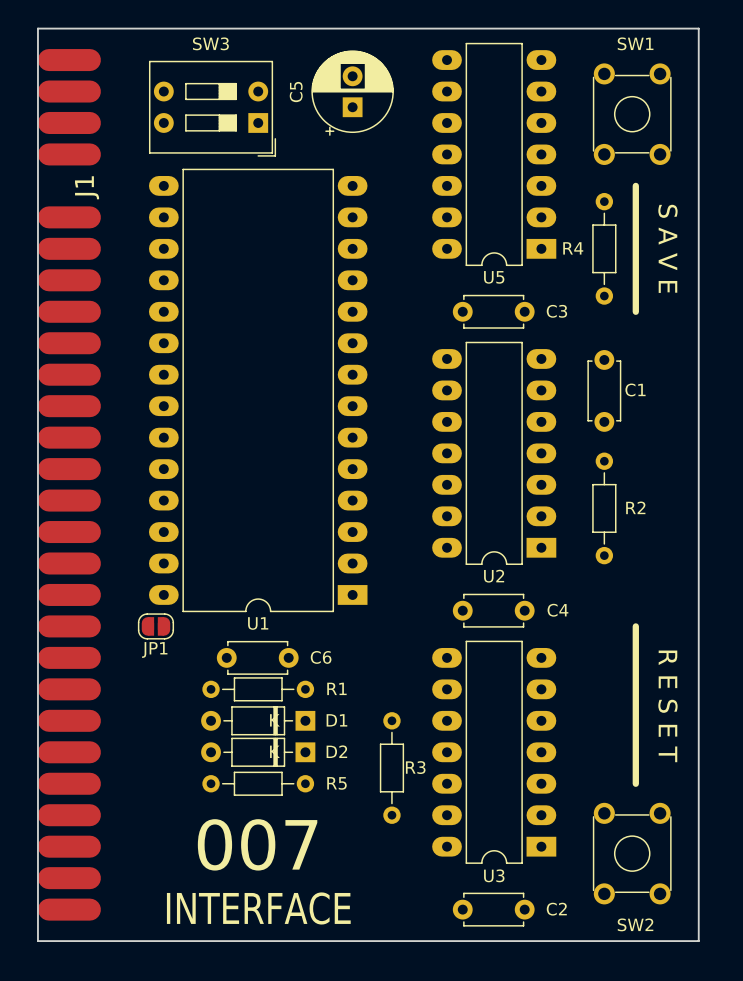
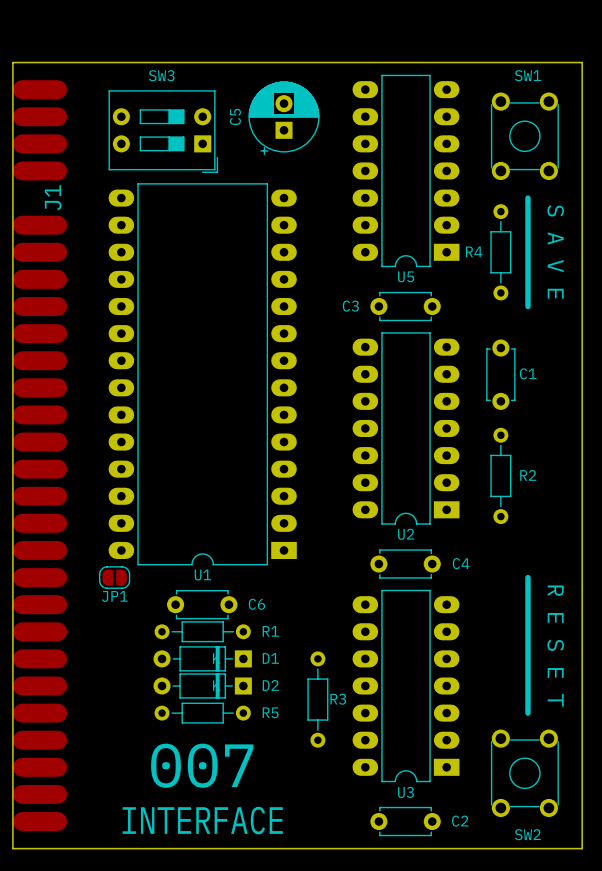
C3 name position: C3 (556, 311) -> C3 (350, 306)

